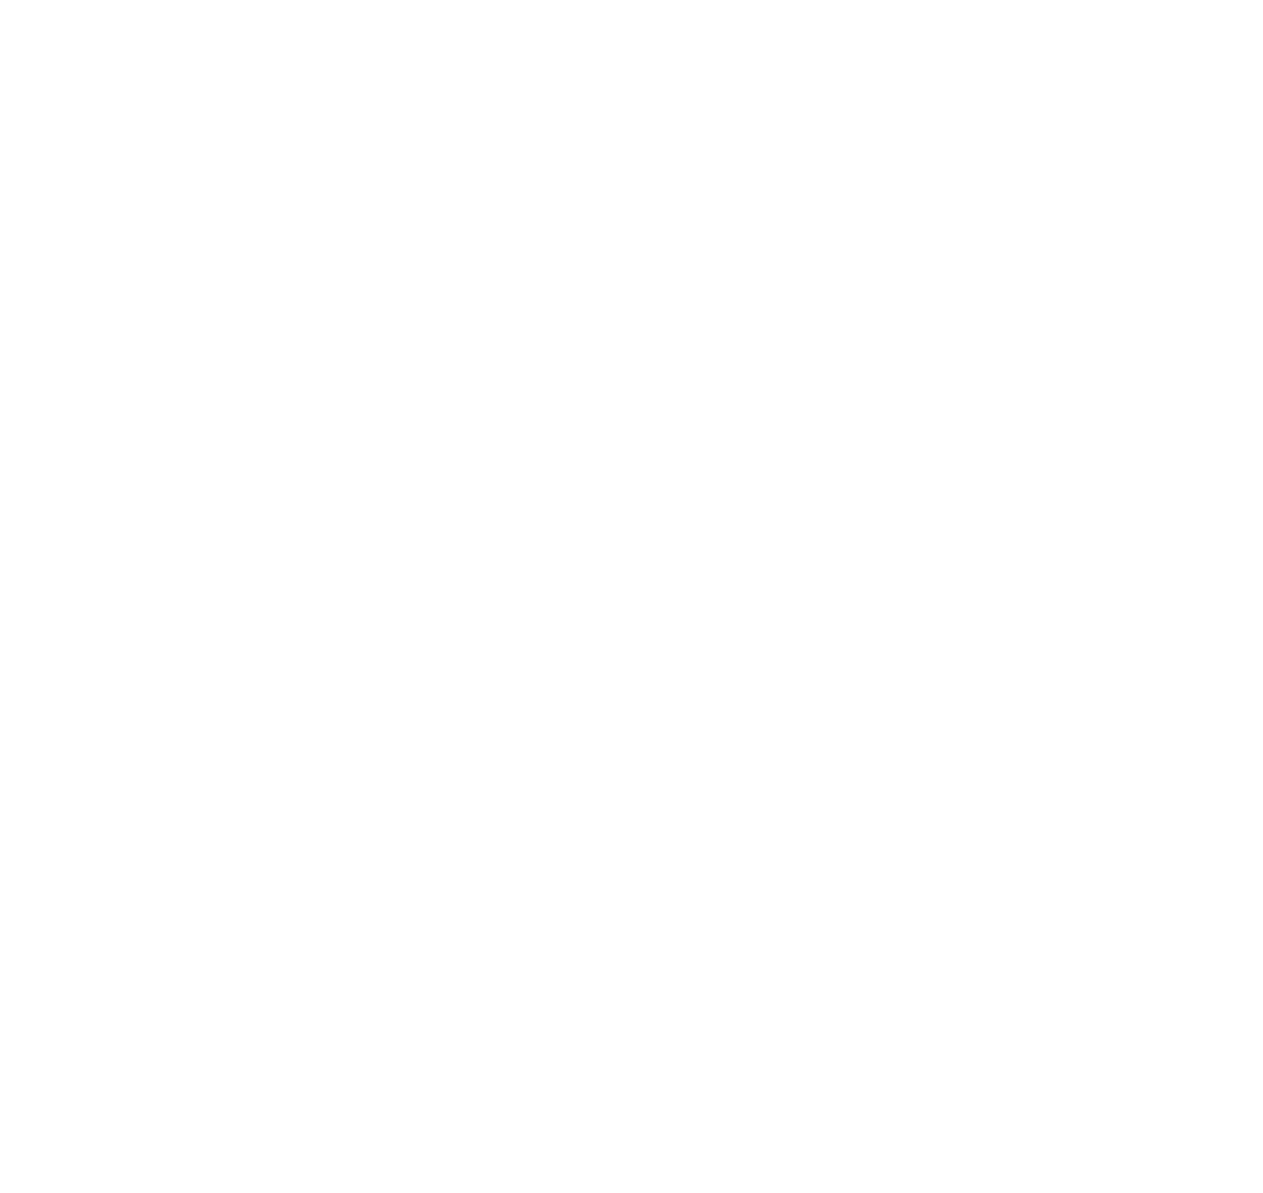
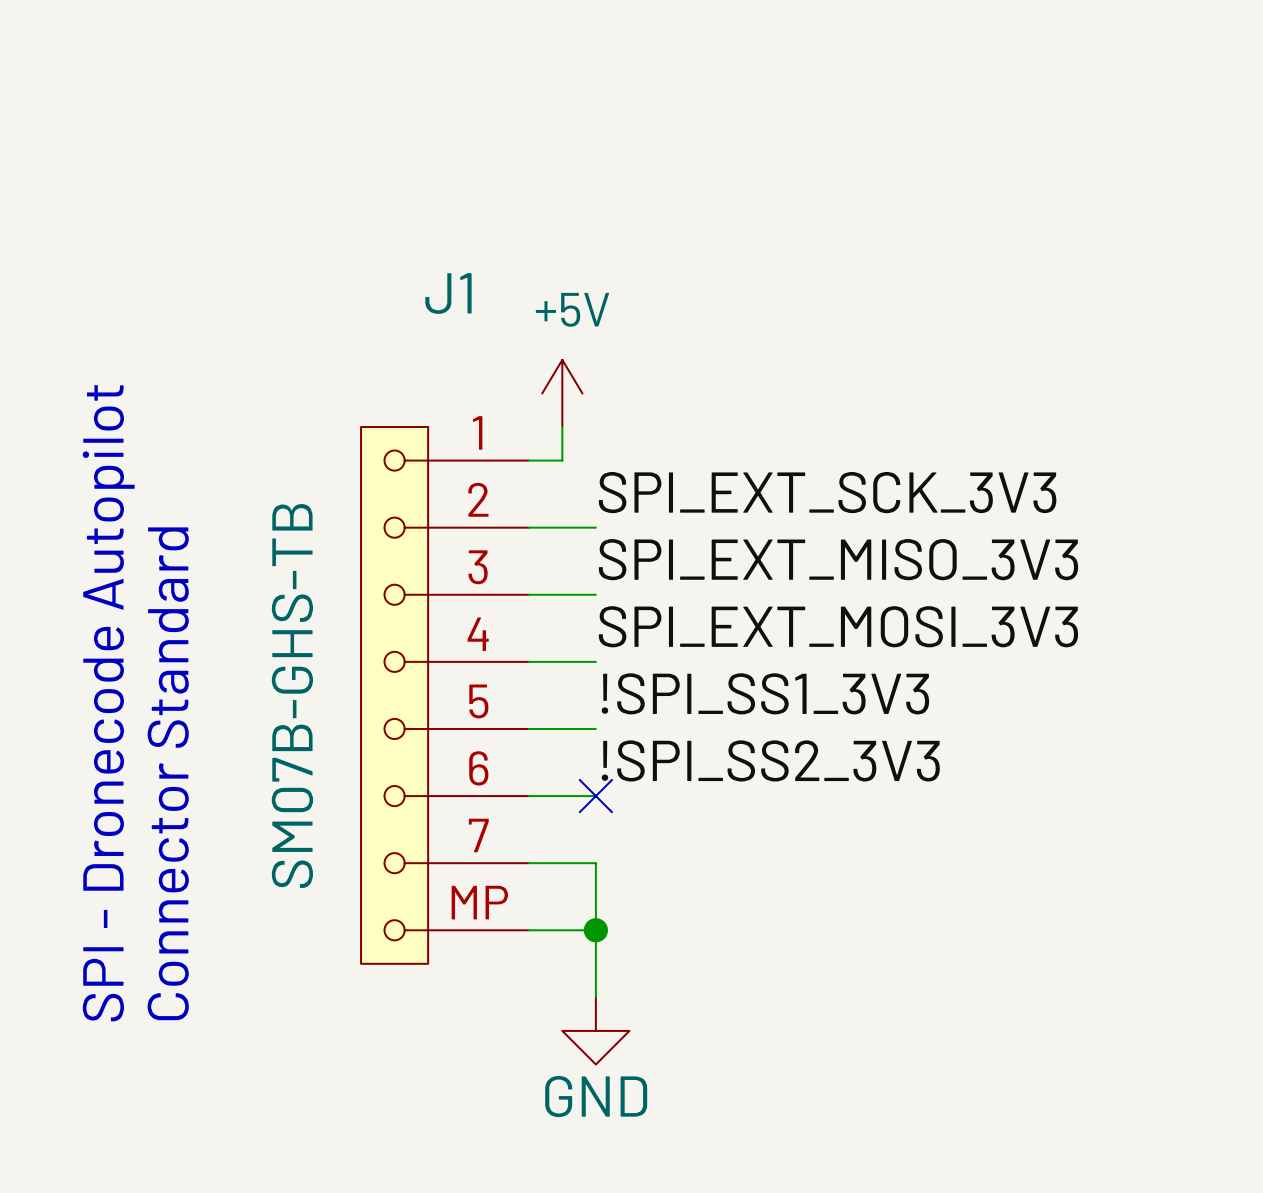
power symbol: none -> +5V (562, 393)
wire: none -> (562, 427) (562, 460) (528, 460)
label: none -> SPI_EXT_SCK_3V3 (827, 492)
wire: none -> (528, 527) (595, 527)
label: none -> SPI_EXT_MISO_3V3 (838, 559)
wire: none -> (528, 594) (595, 594)
label: none -> SPI_EXT_MOSI_3V3 (838, 626)
wire: none -> (528, 661) (595, 661)
label: none -> !SPI_SS1_3V3 (765, 693)
J1: none -> SM07B-GHS-TB (444, 695)
text: none -> SPI - Dronecode Autopilot (108, 703)
wire: none -> (528, 728) (595, 728)
label: none -> !SPI_SS2_3V3 (770, 760)
text: none -> Connector Standard (168, 773)
wire: none -> (528, 796) (595, 796)
no-connect mark: none -> (595, 796)
wire: none -> (528, 863) (595, 863) (595, 997)
wire: none -> (528, 930) (595, 930)
junction: none -> (595, 930)
power symbol: none -> GND (595, 1030)

